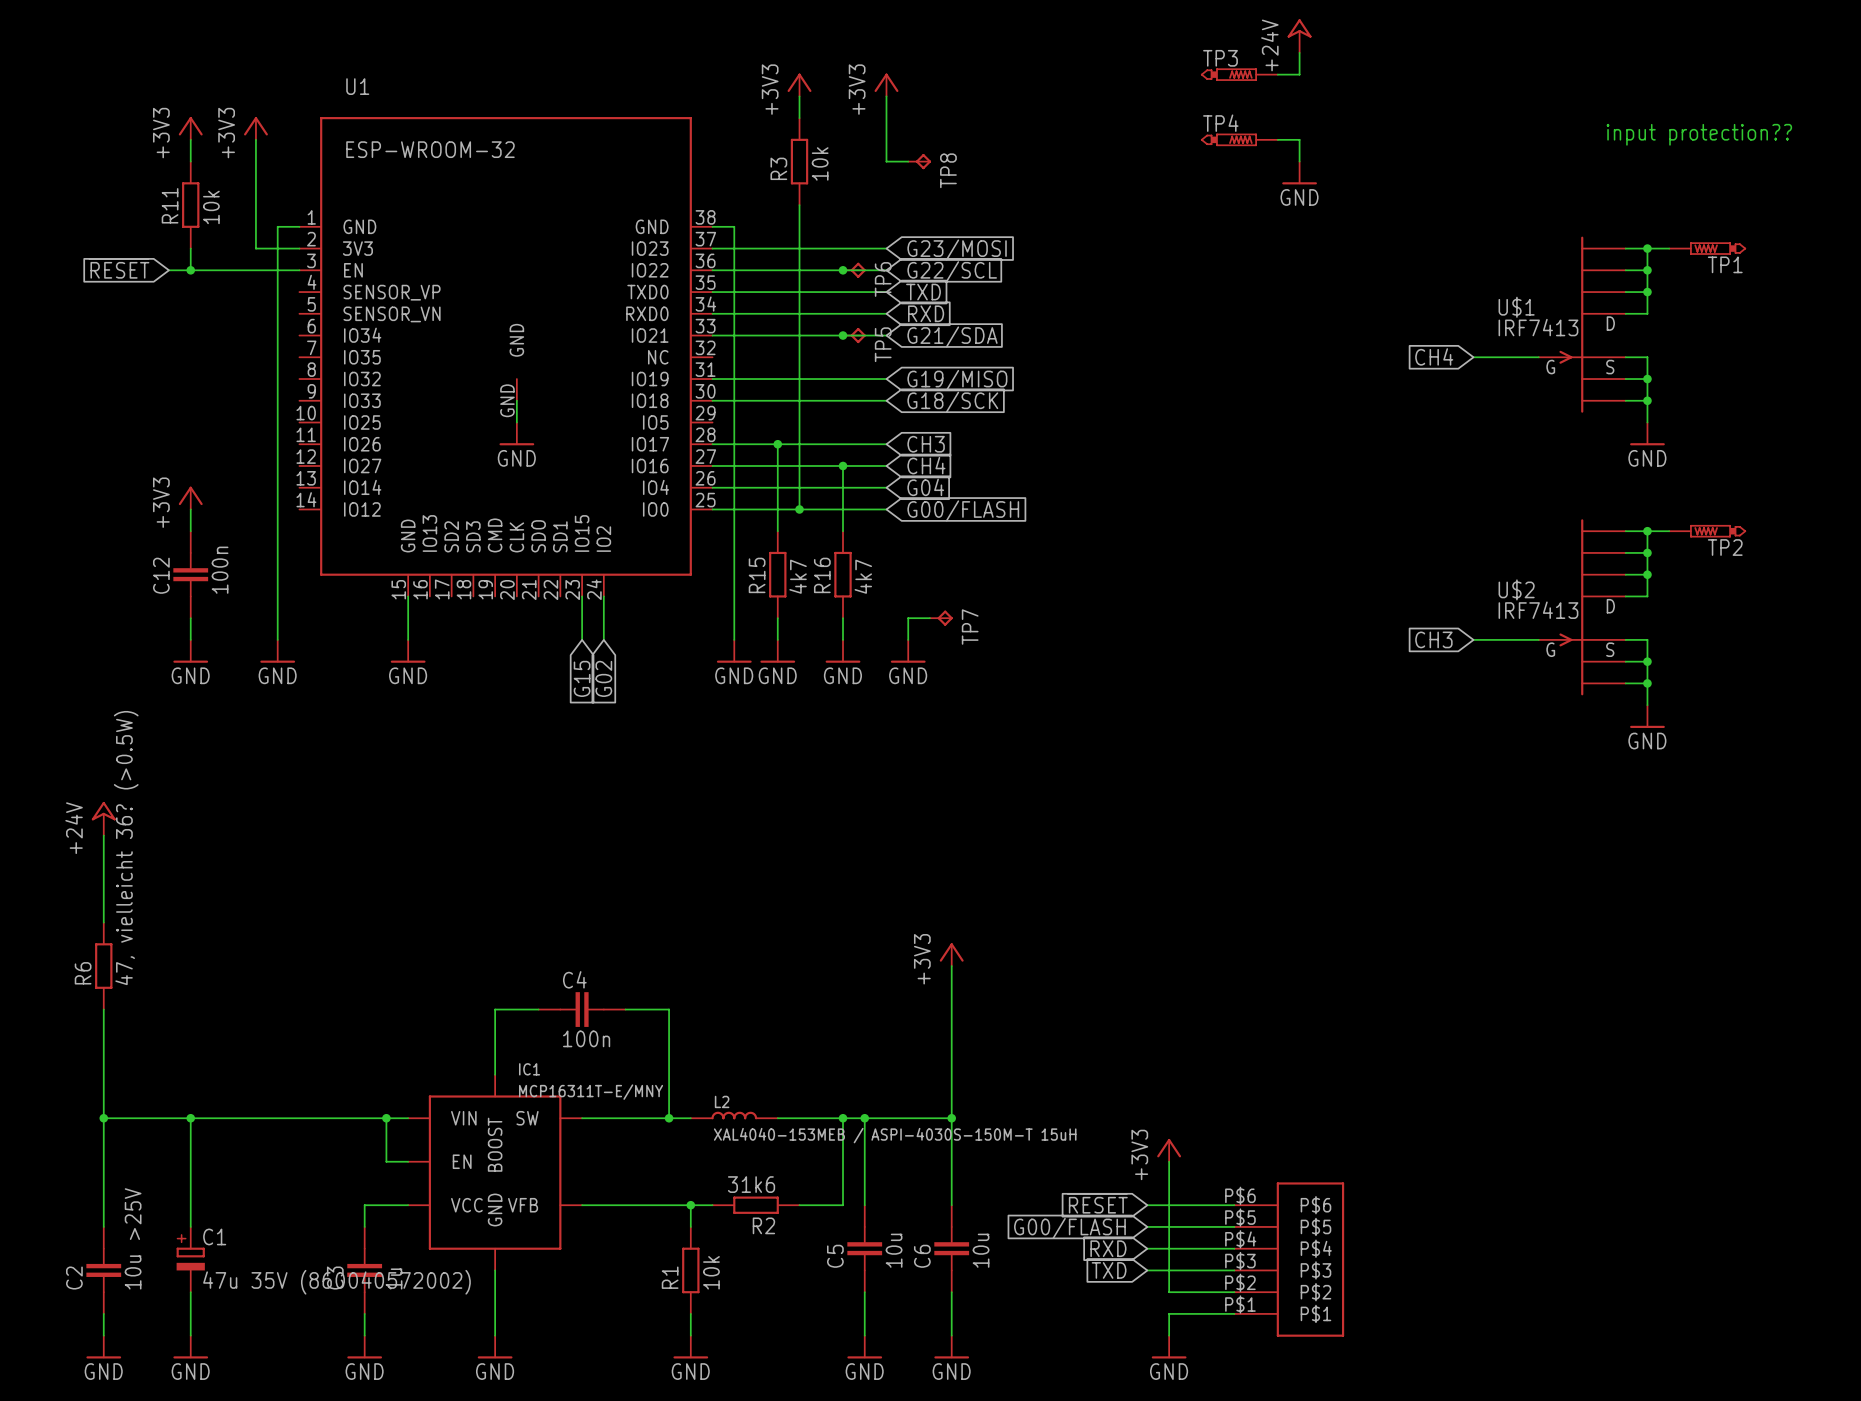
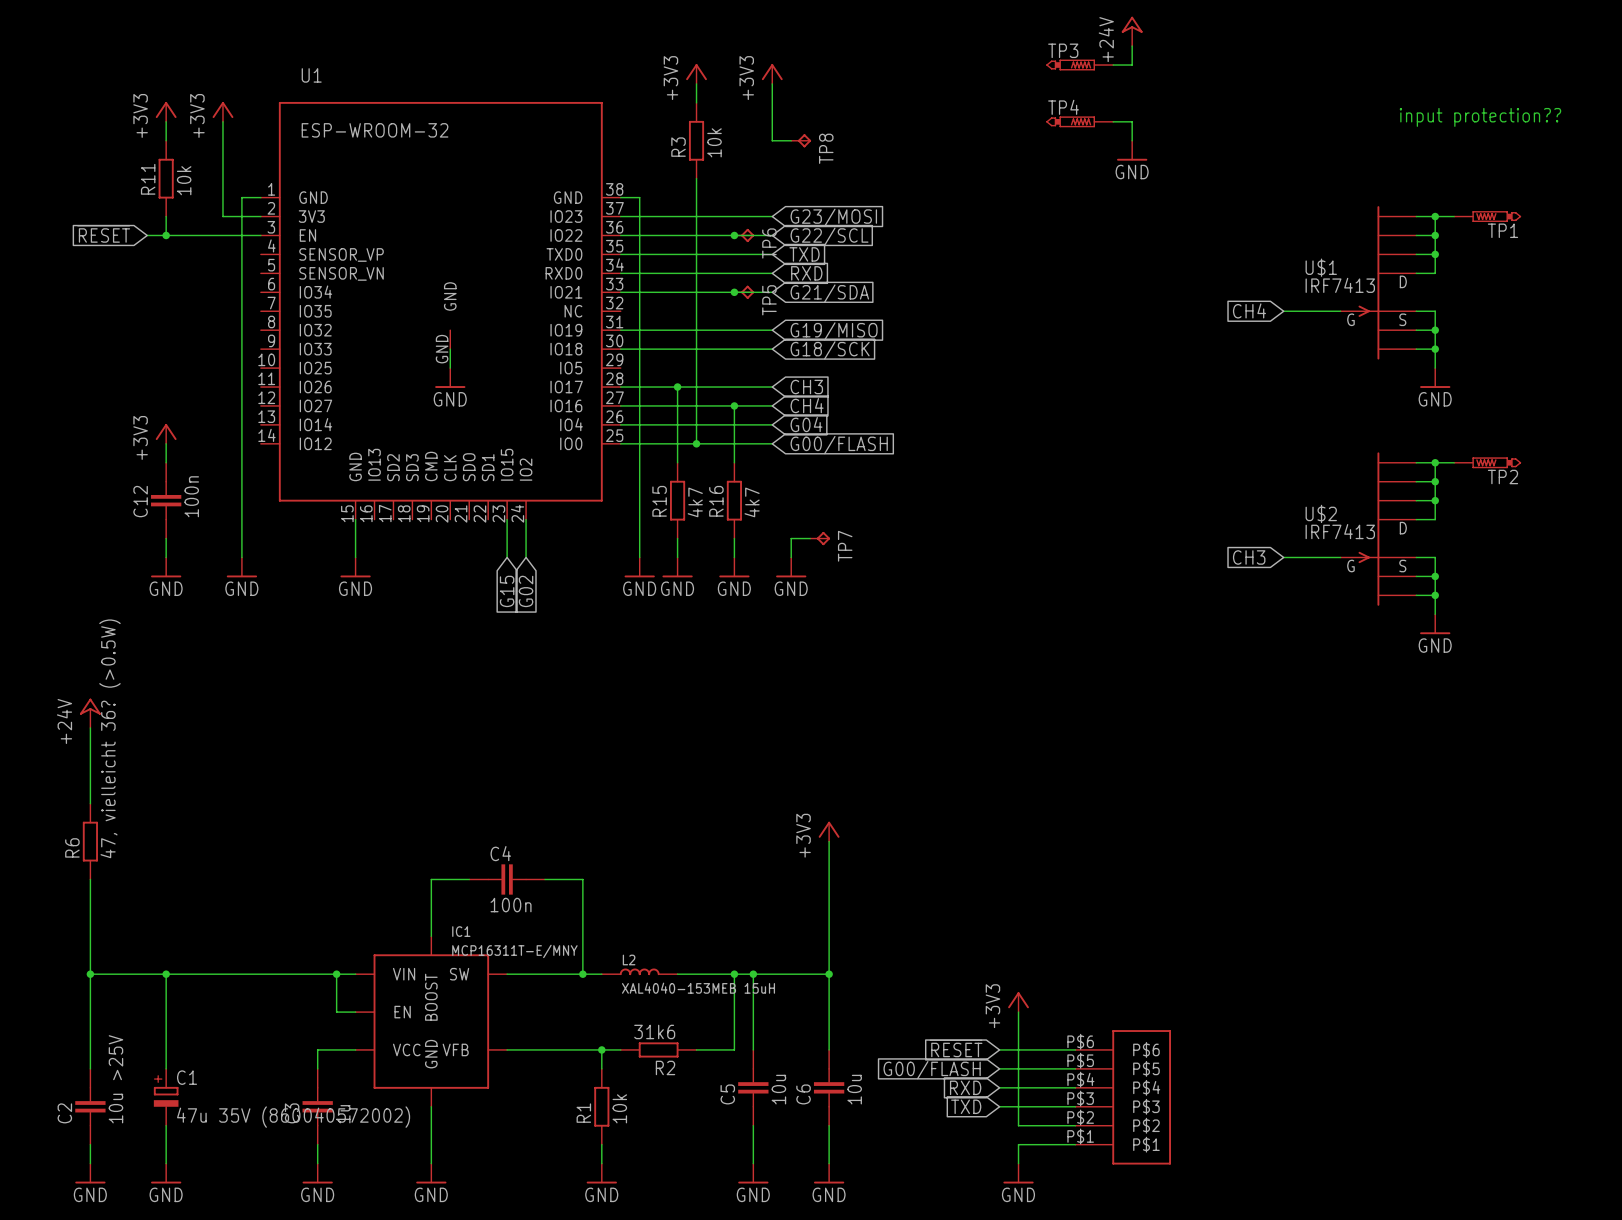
L2 value: XAL4040-153MEB / ASPI-4030S-150M-T 15uH (895, 1135) -> XAL4040-153MEB 15uH (698, 988)

